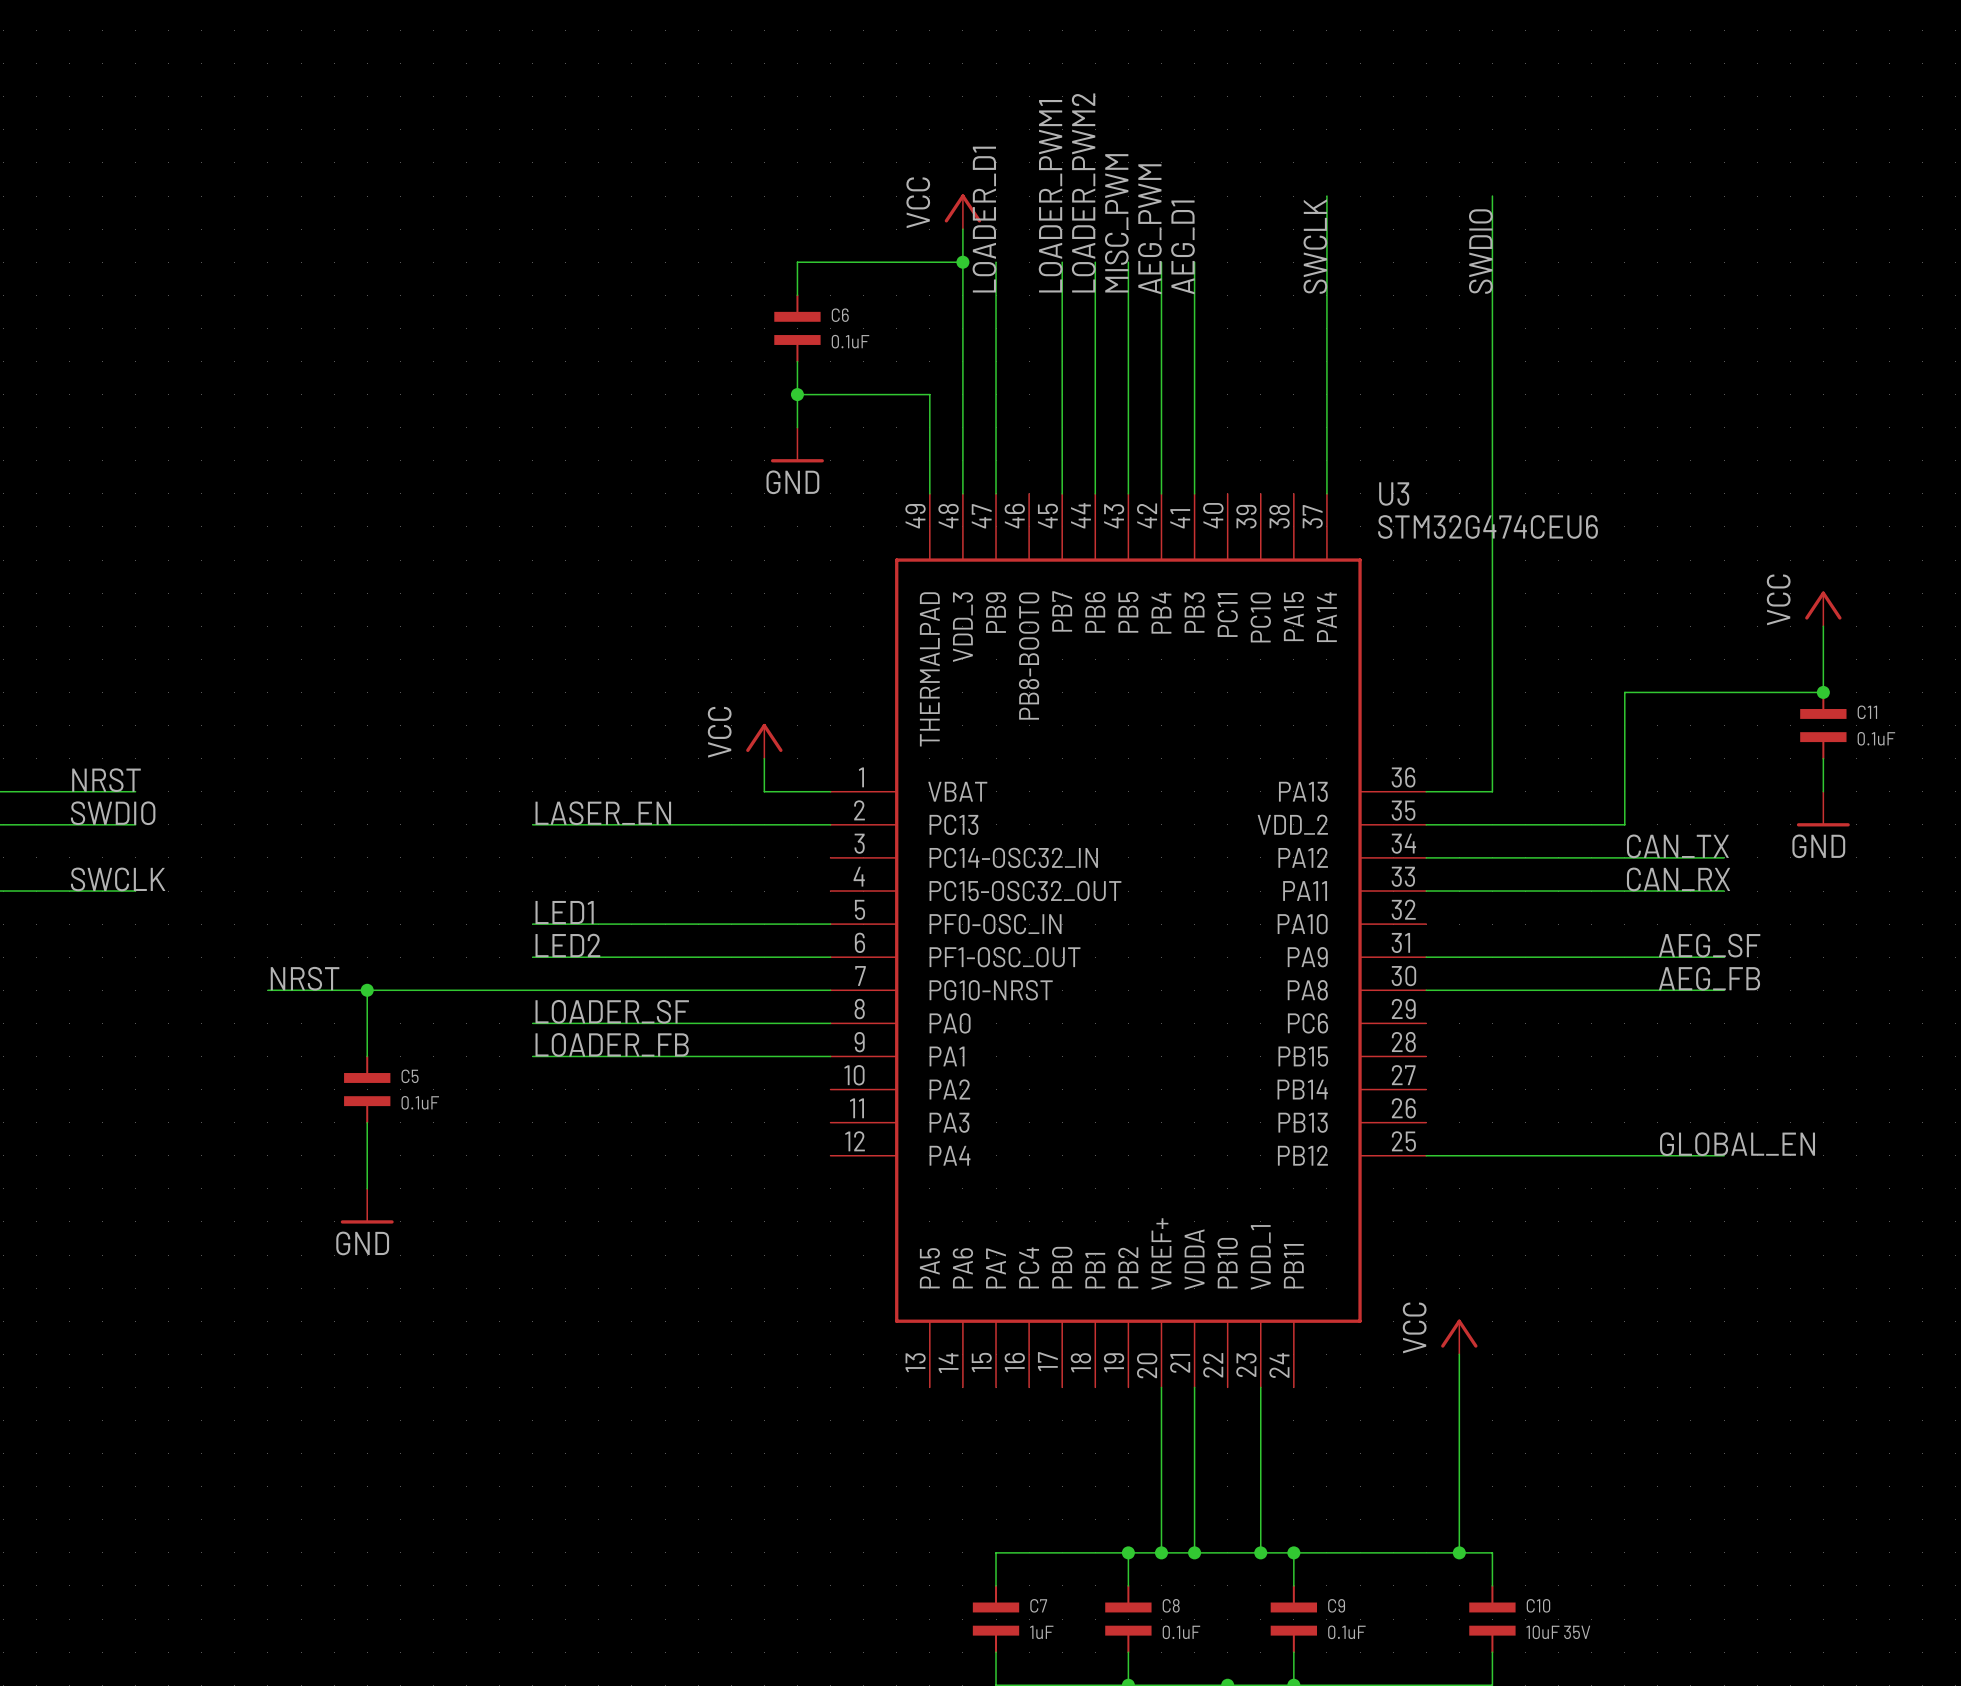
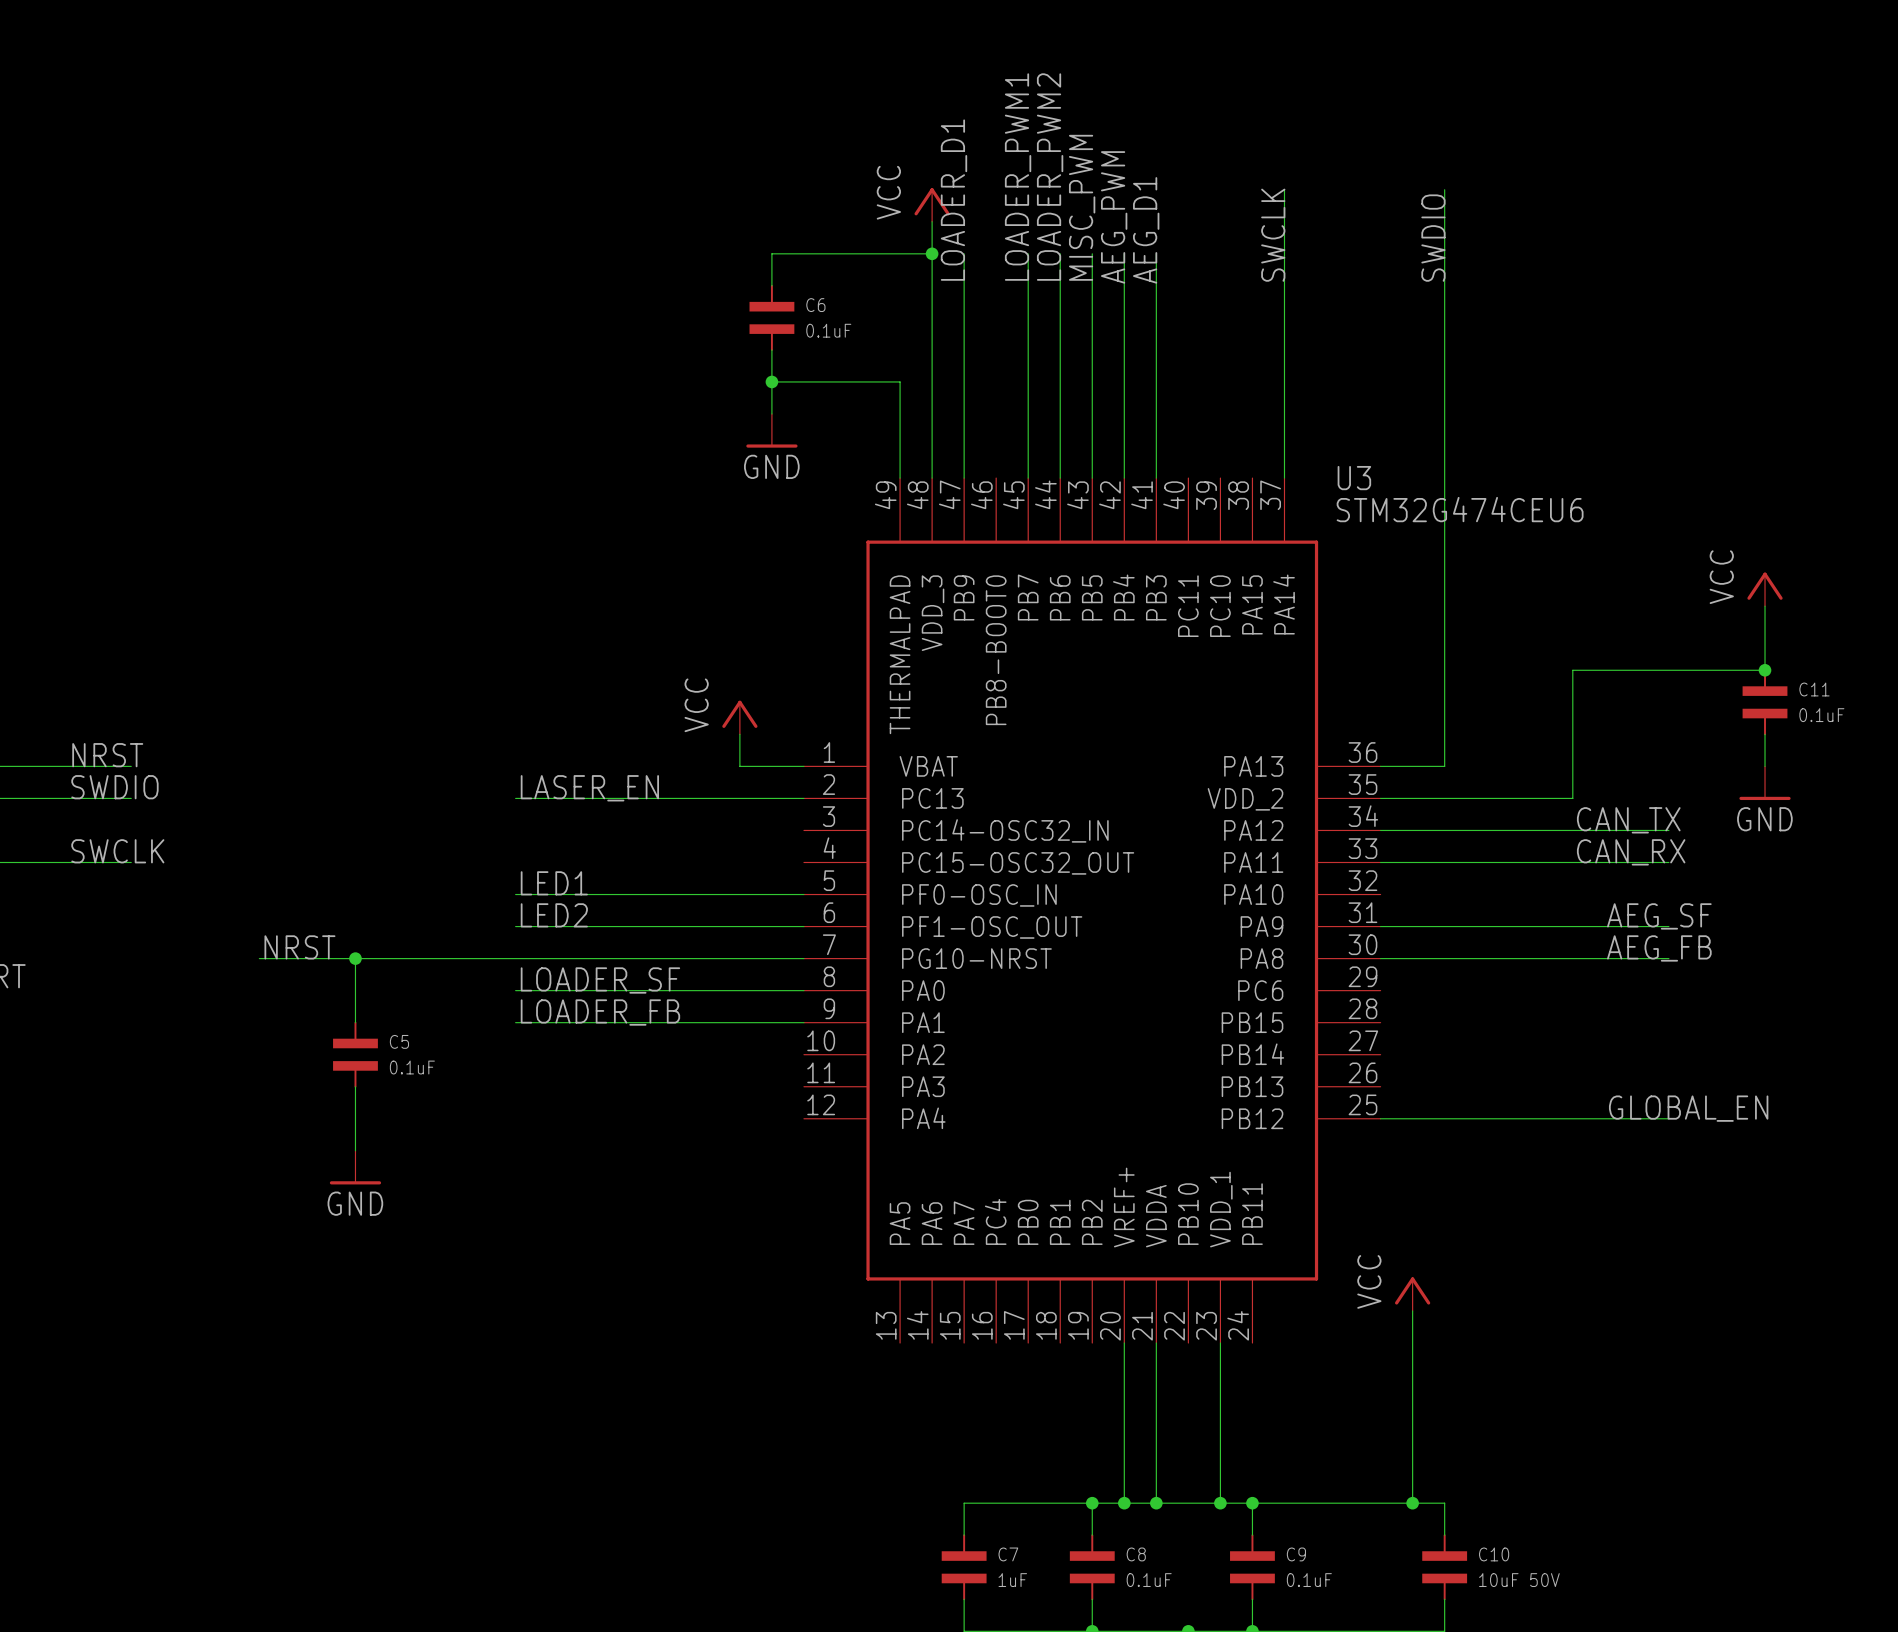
C10 value: 10uF 35V (1558, 1632) -> 10uF 50V (1519, 1580)

